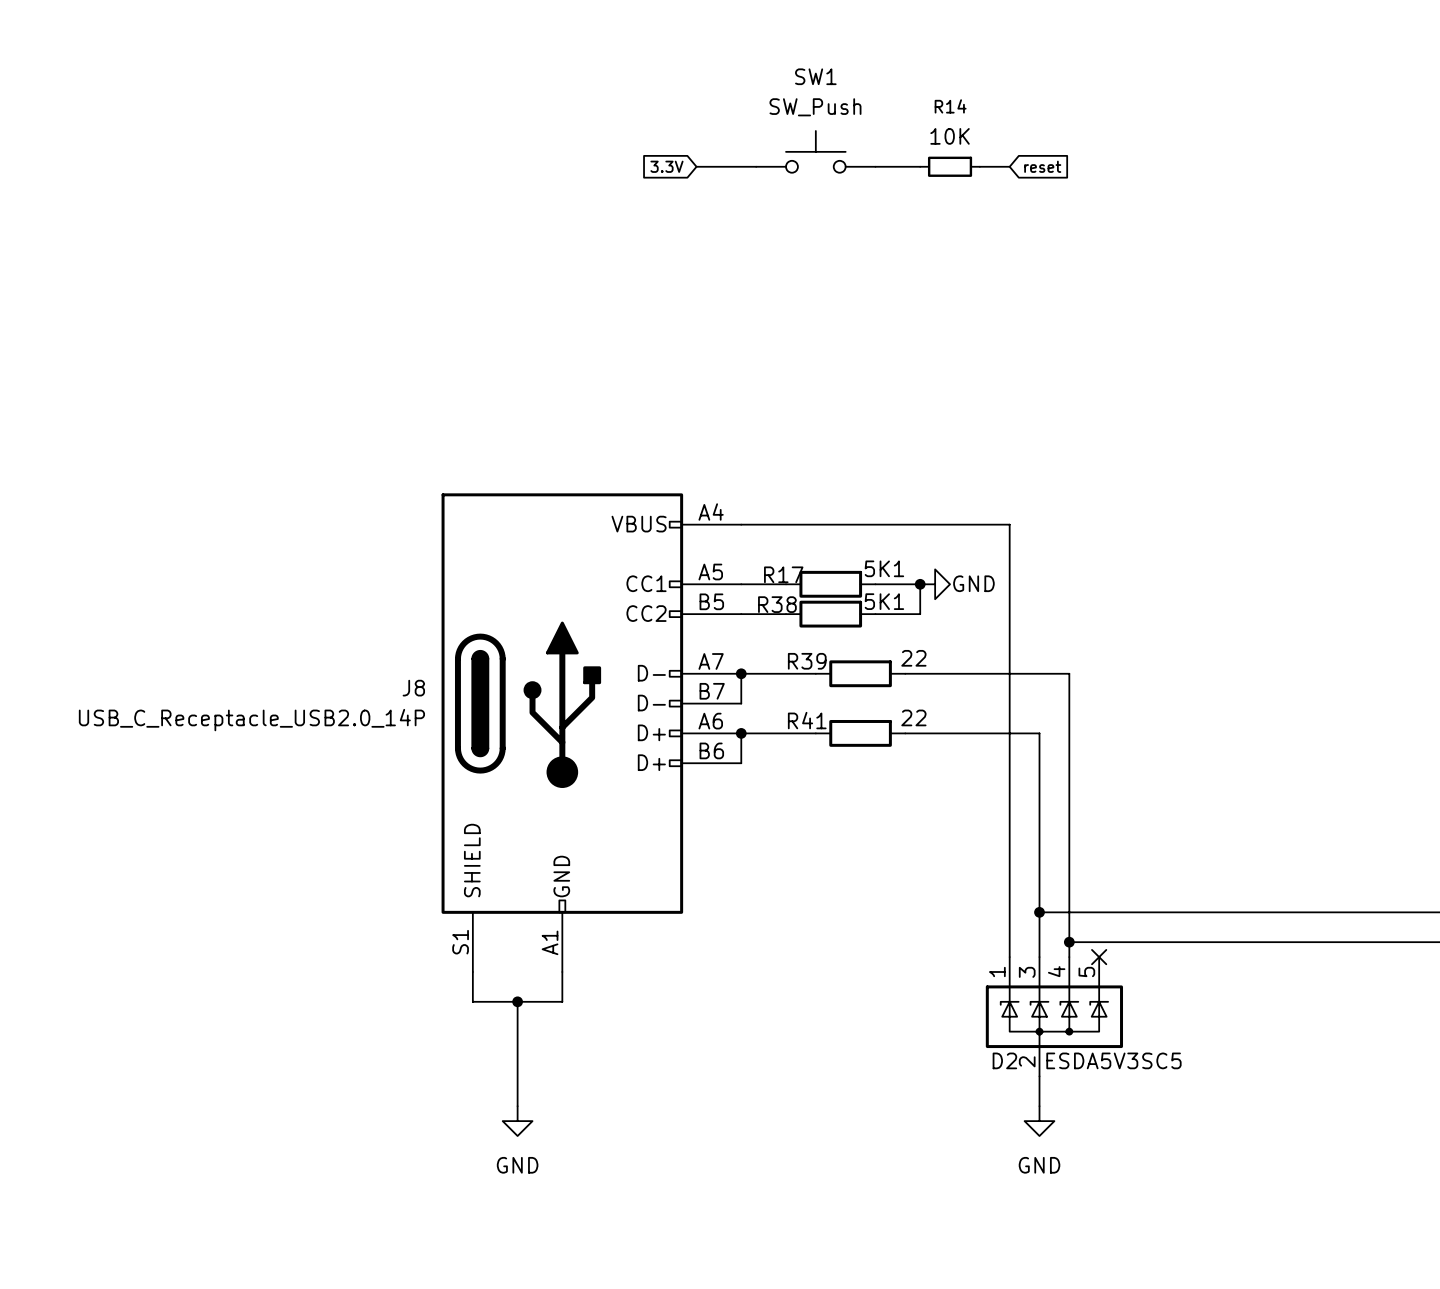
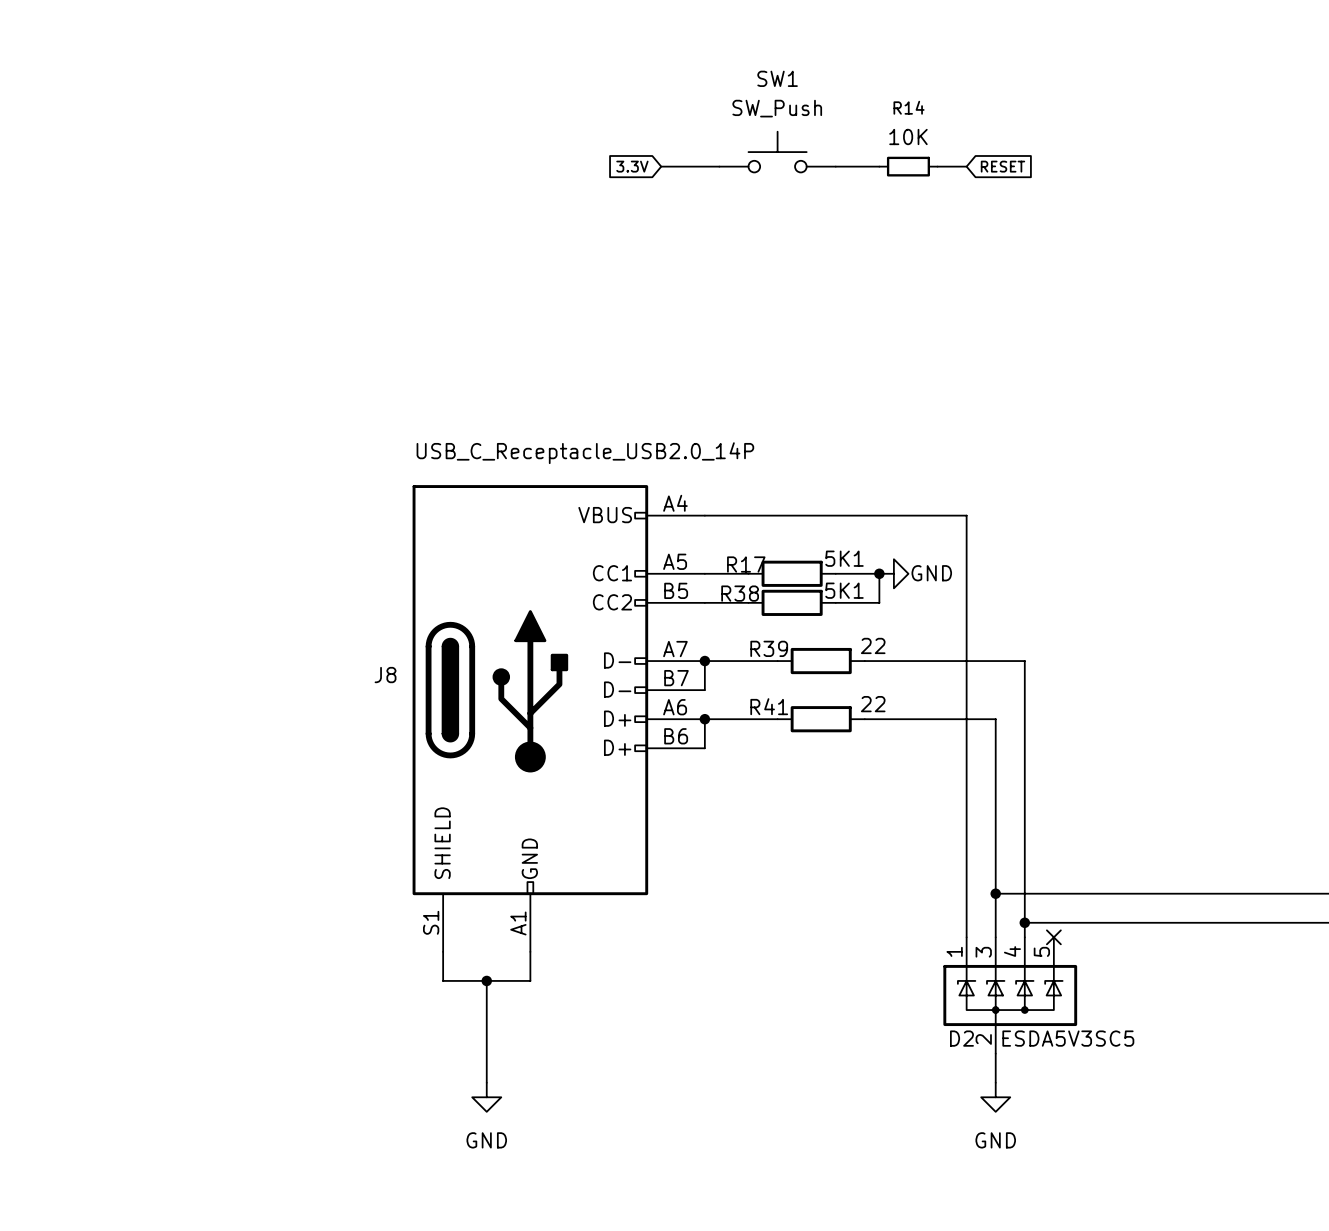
global label: reset (1042, 166) -> RESET (1002, 166)
J8 value position: USB_C_Receptacle_USB2.0_14P (251, 720) -> USB_C_Receptacle_USB2.0_14P (585, 453)

